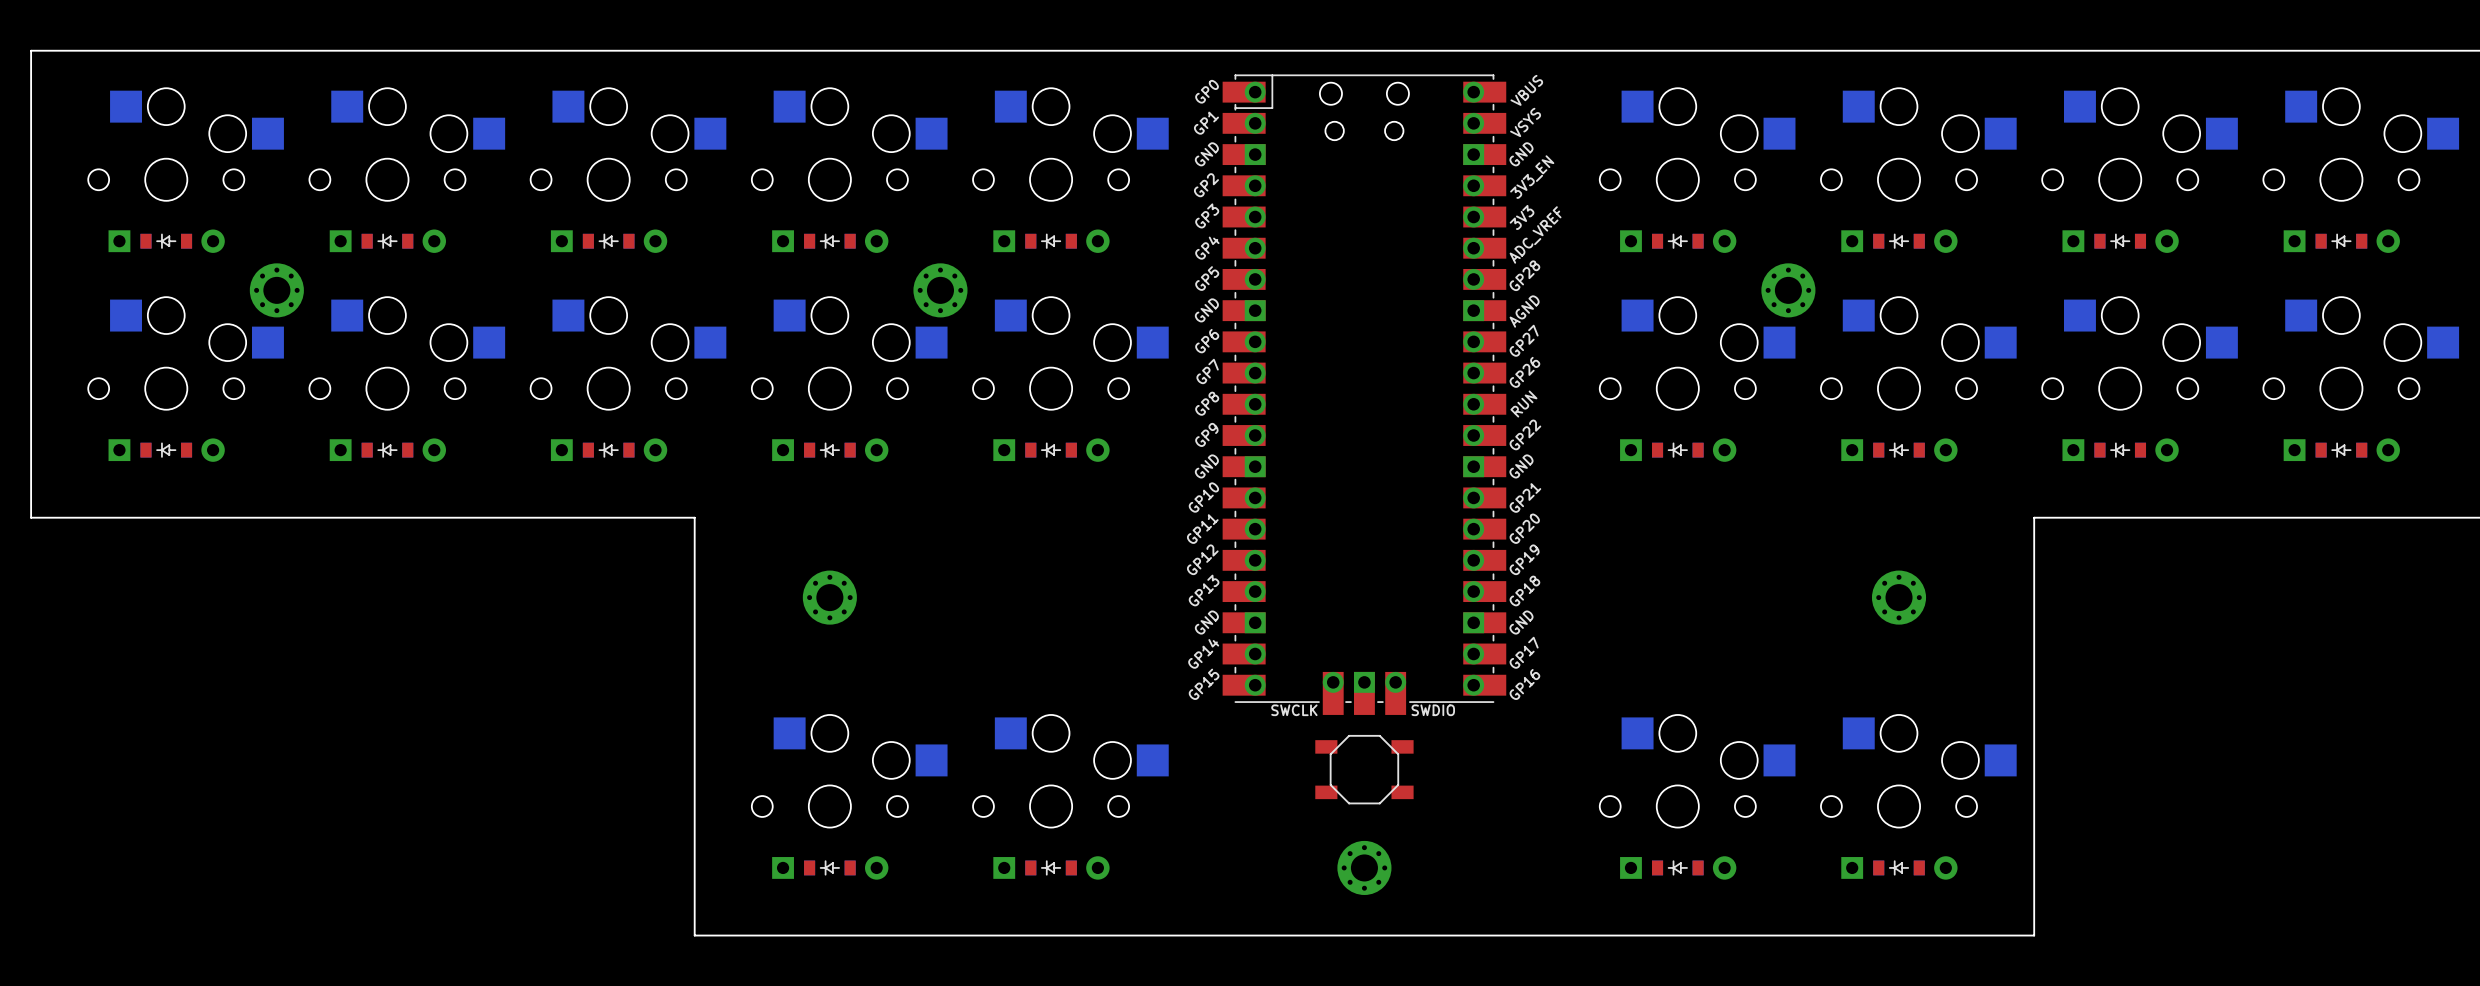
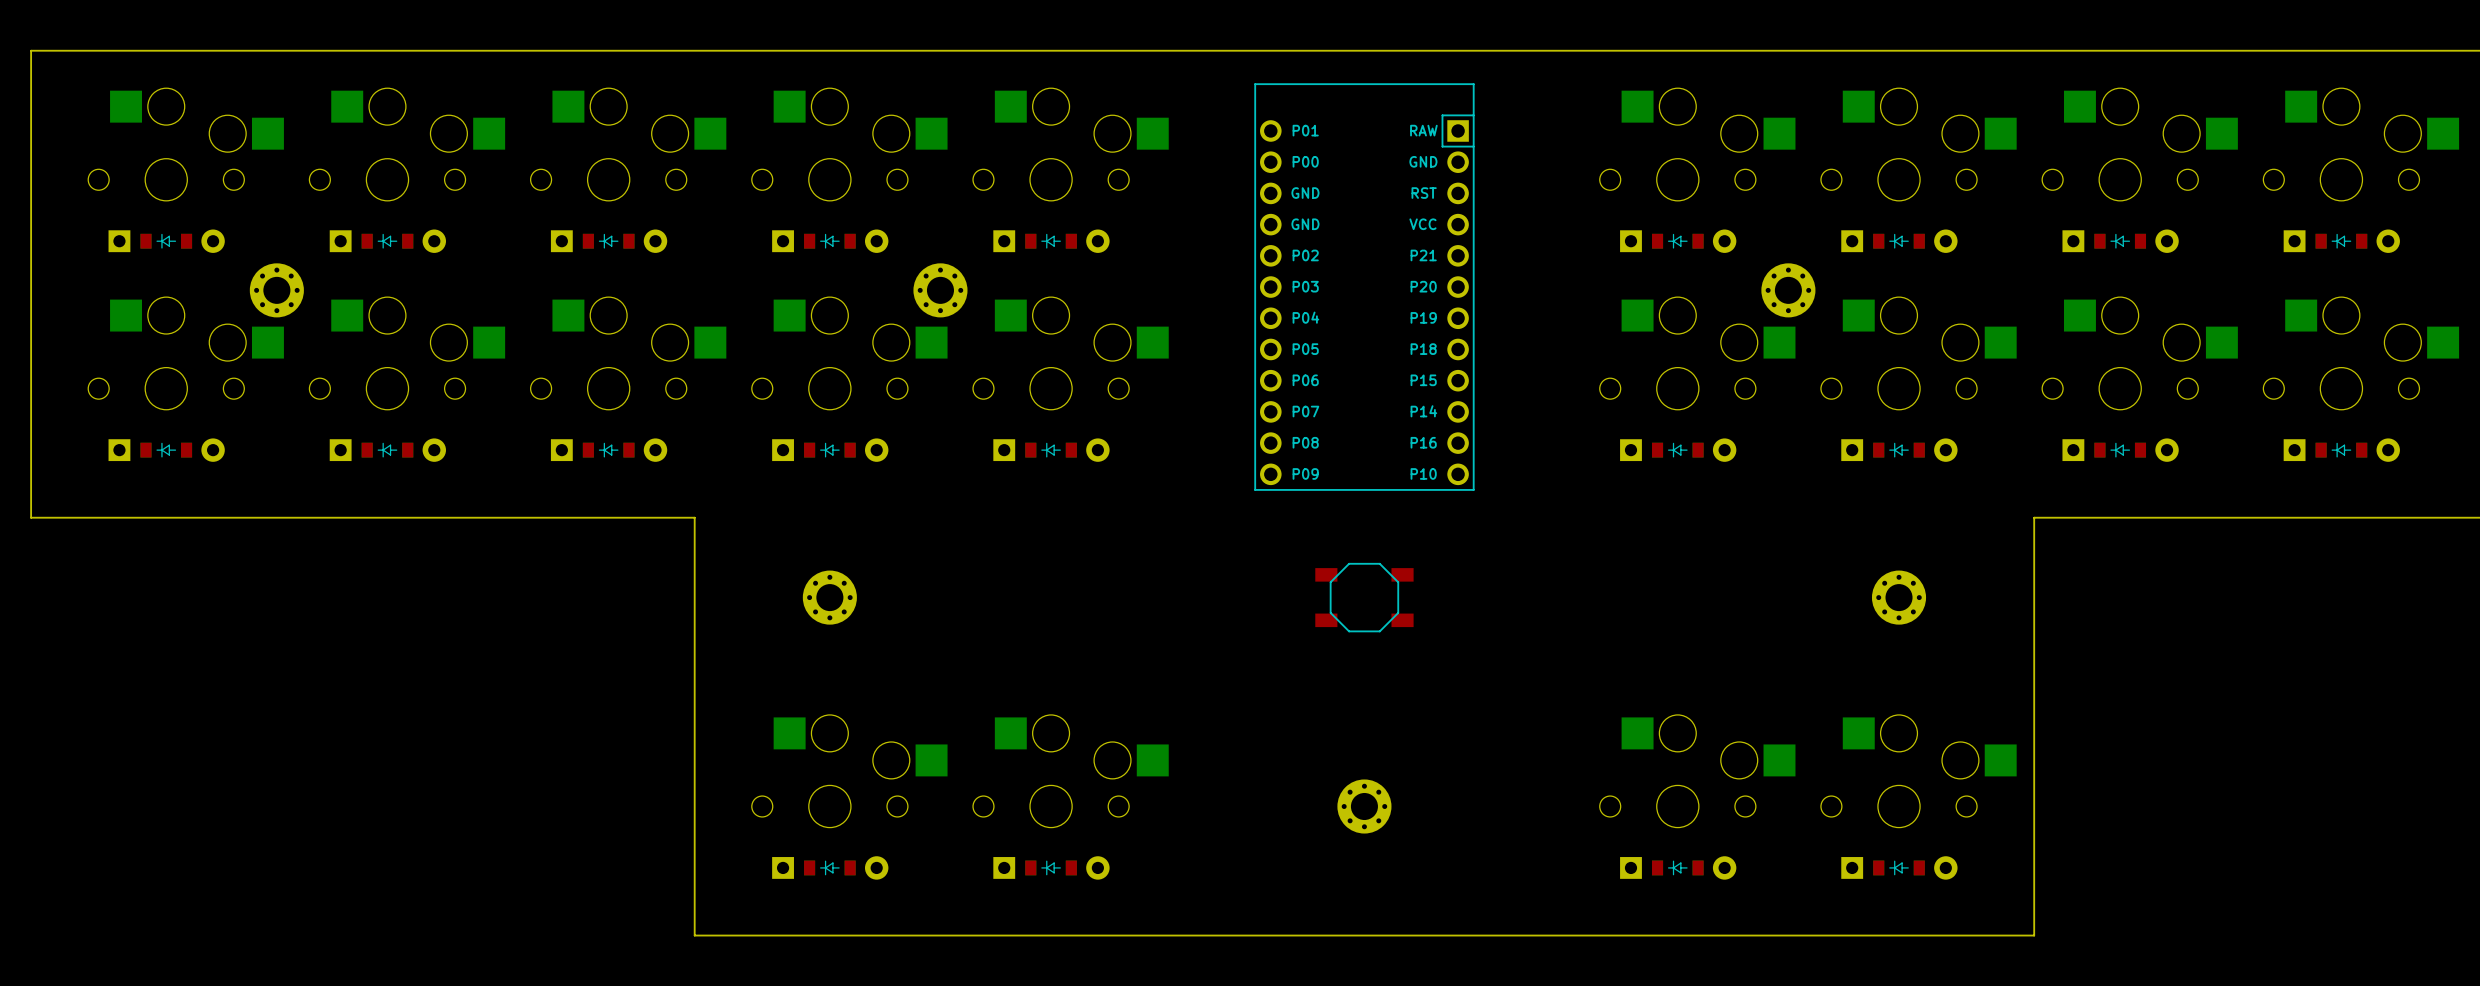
part: none -> (1364, 287)
part: (1364, 394) -> none
part position: (1364, 769) -> (1364, 597)
part position: (1364, 867) -> (1364, 806)

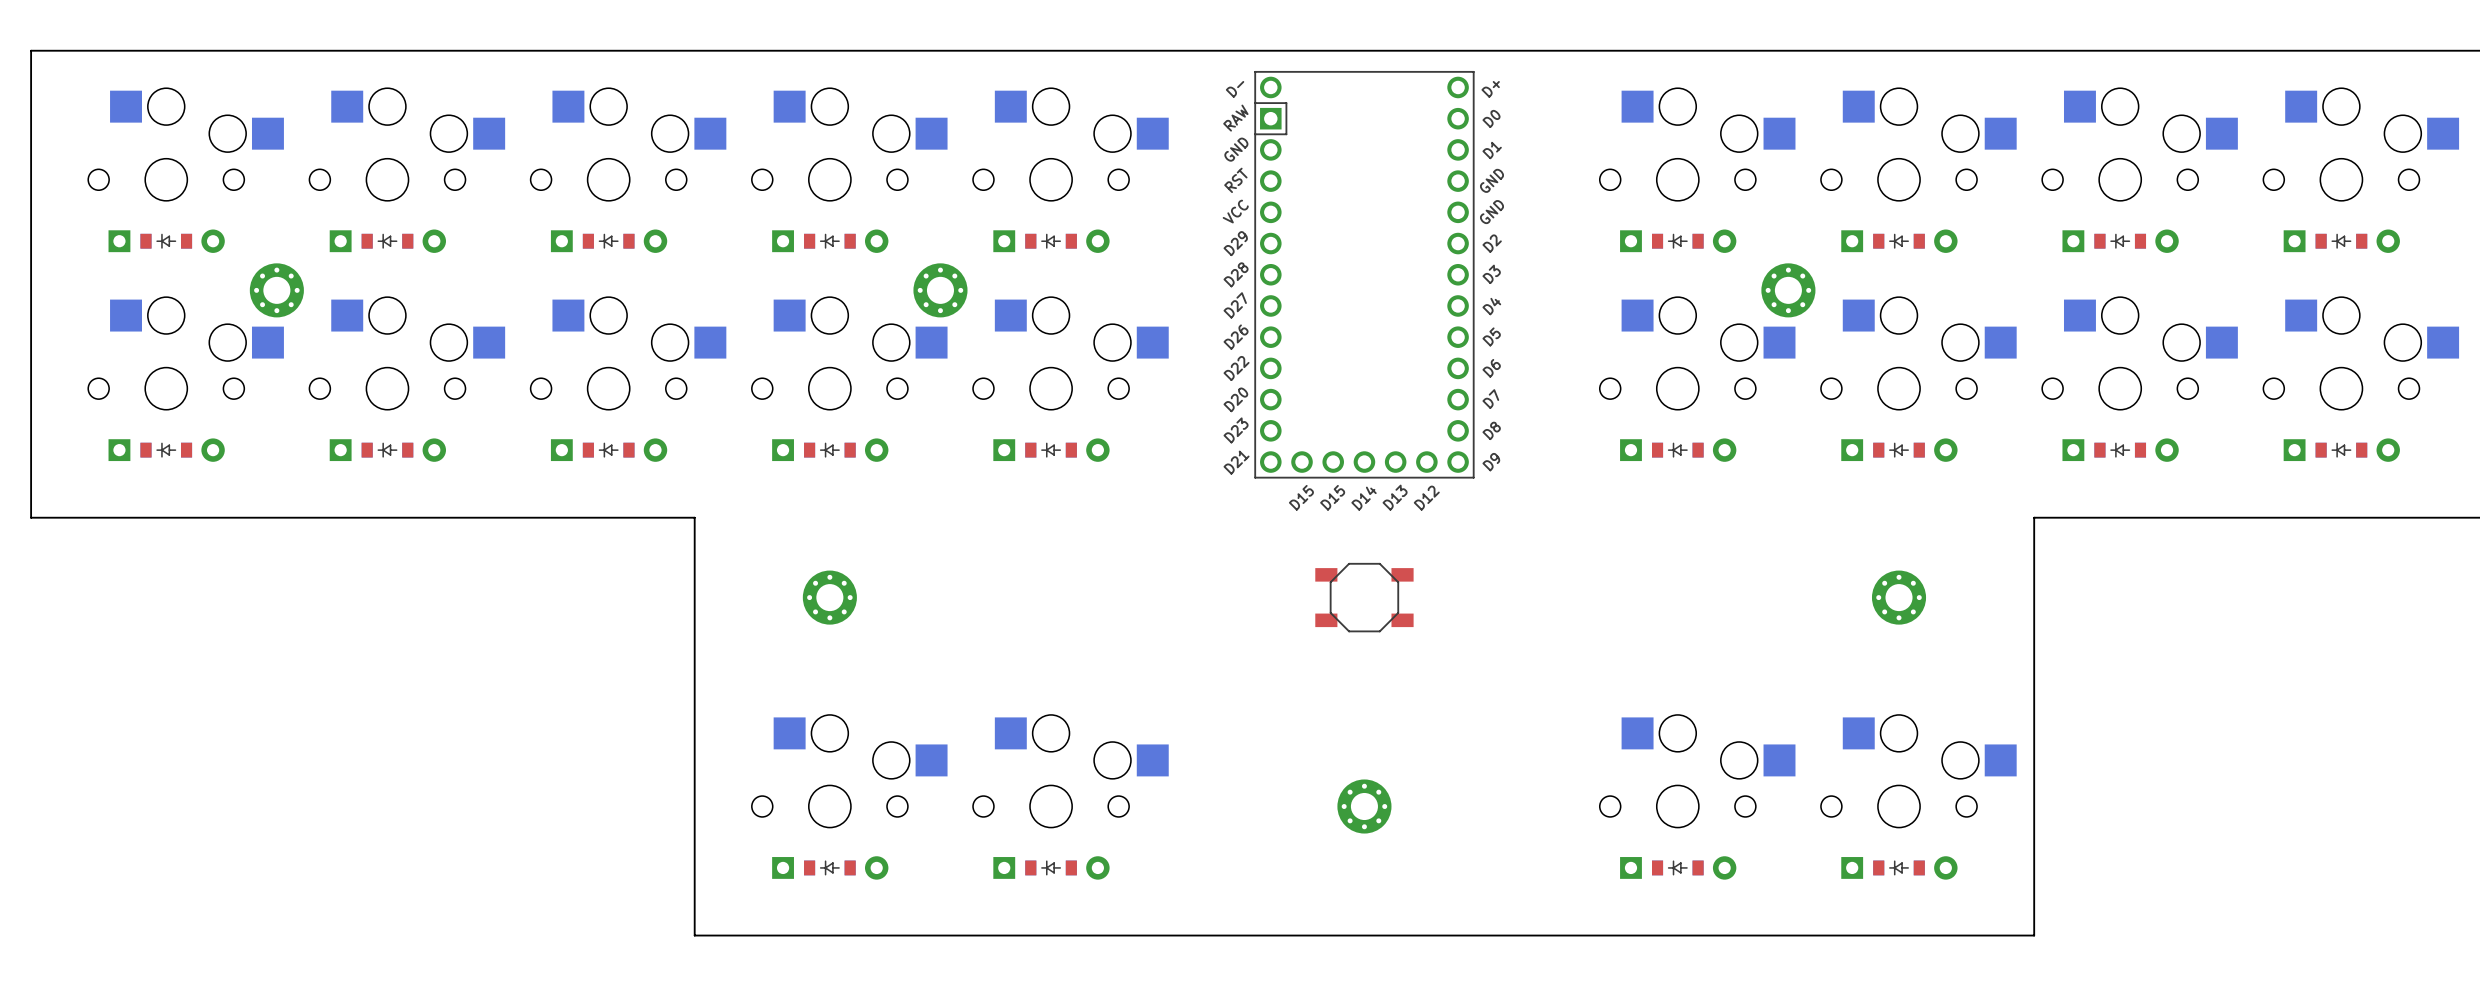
part footprint: [1254, 83, 1475, 491] -> [1254, 70, 1475, 479]

